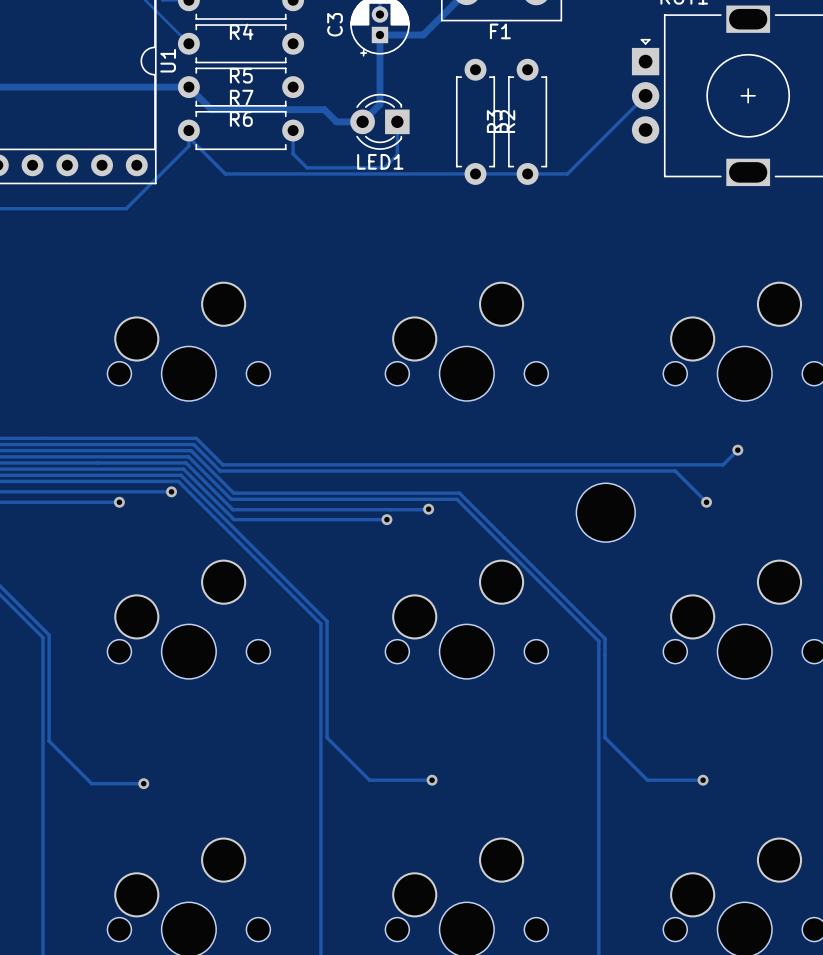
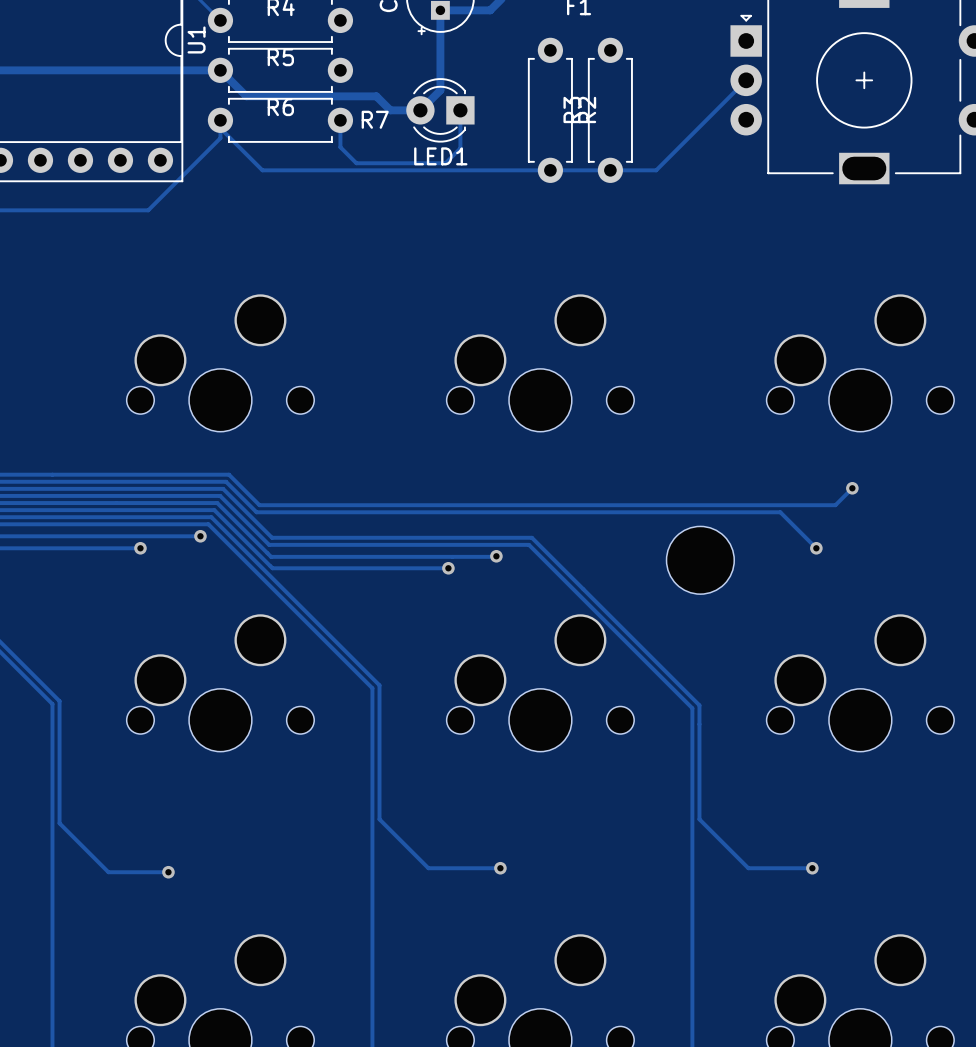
R7 name position: R7 (241, 97) -> R7 (375, 119)

